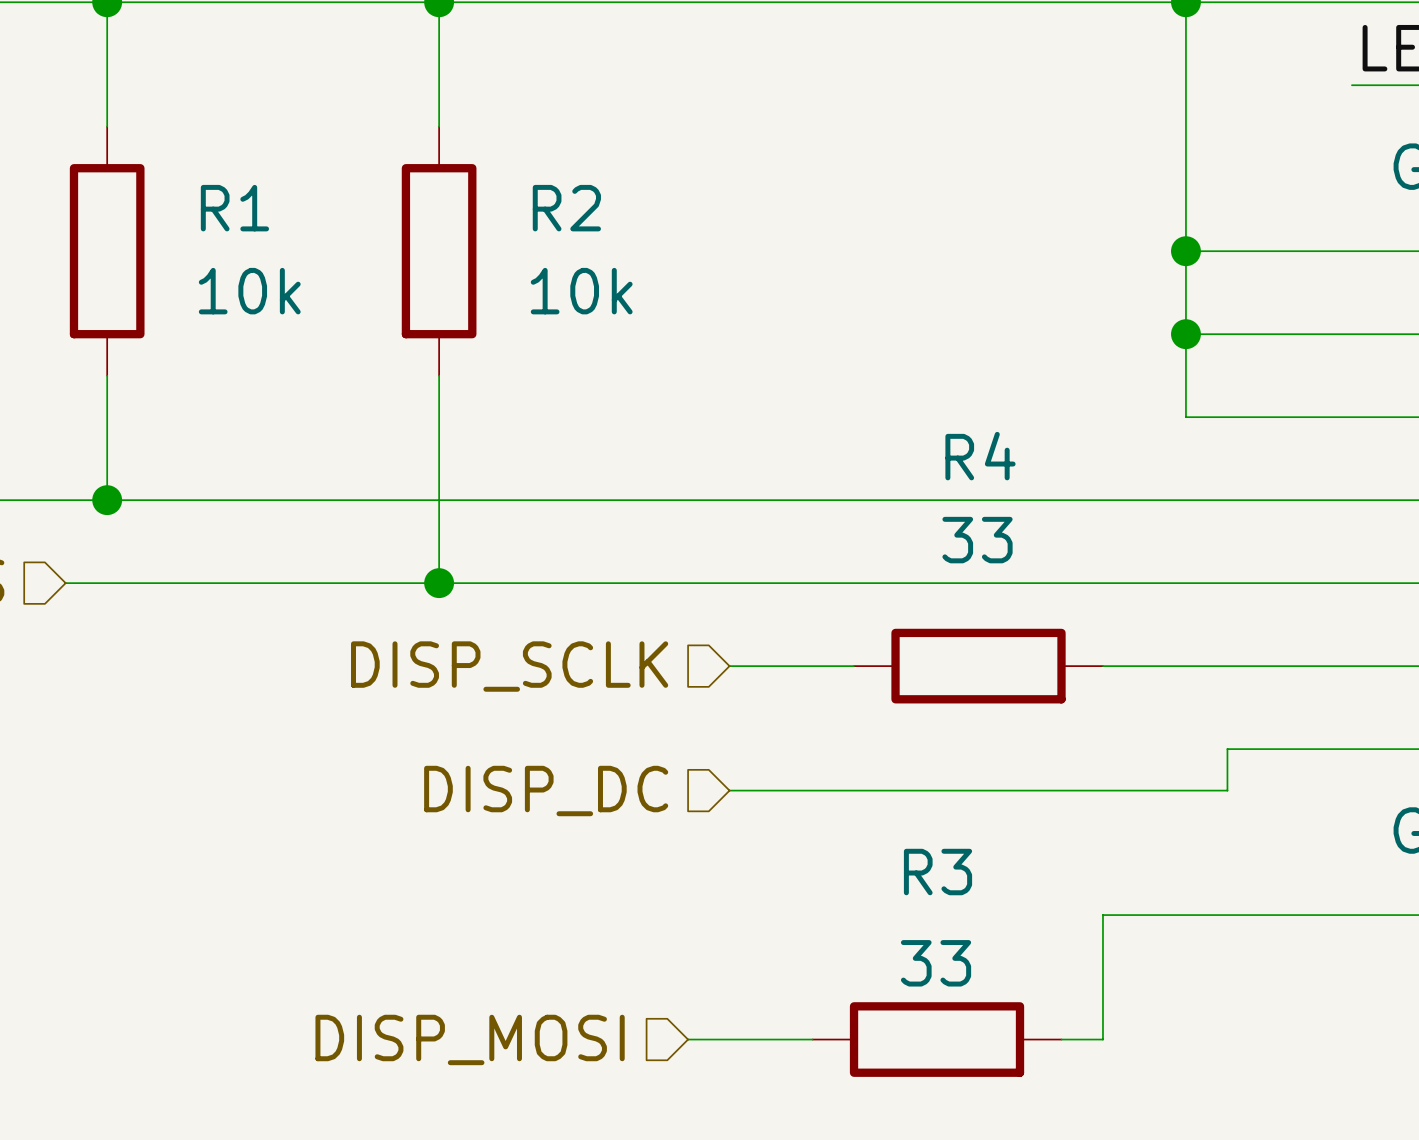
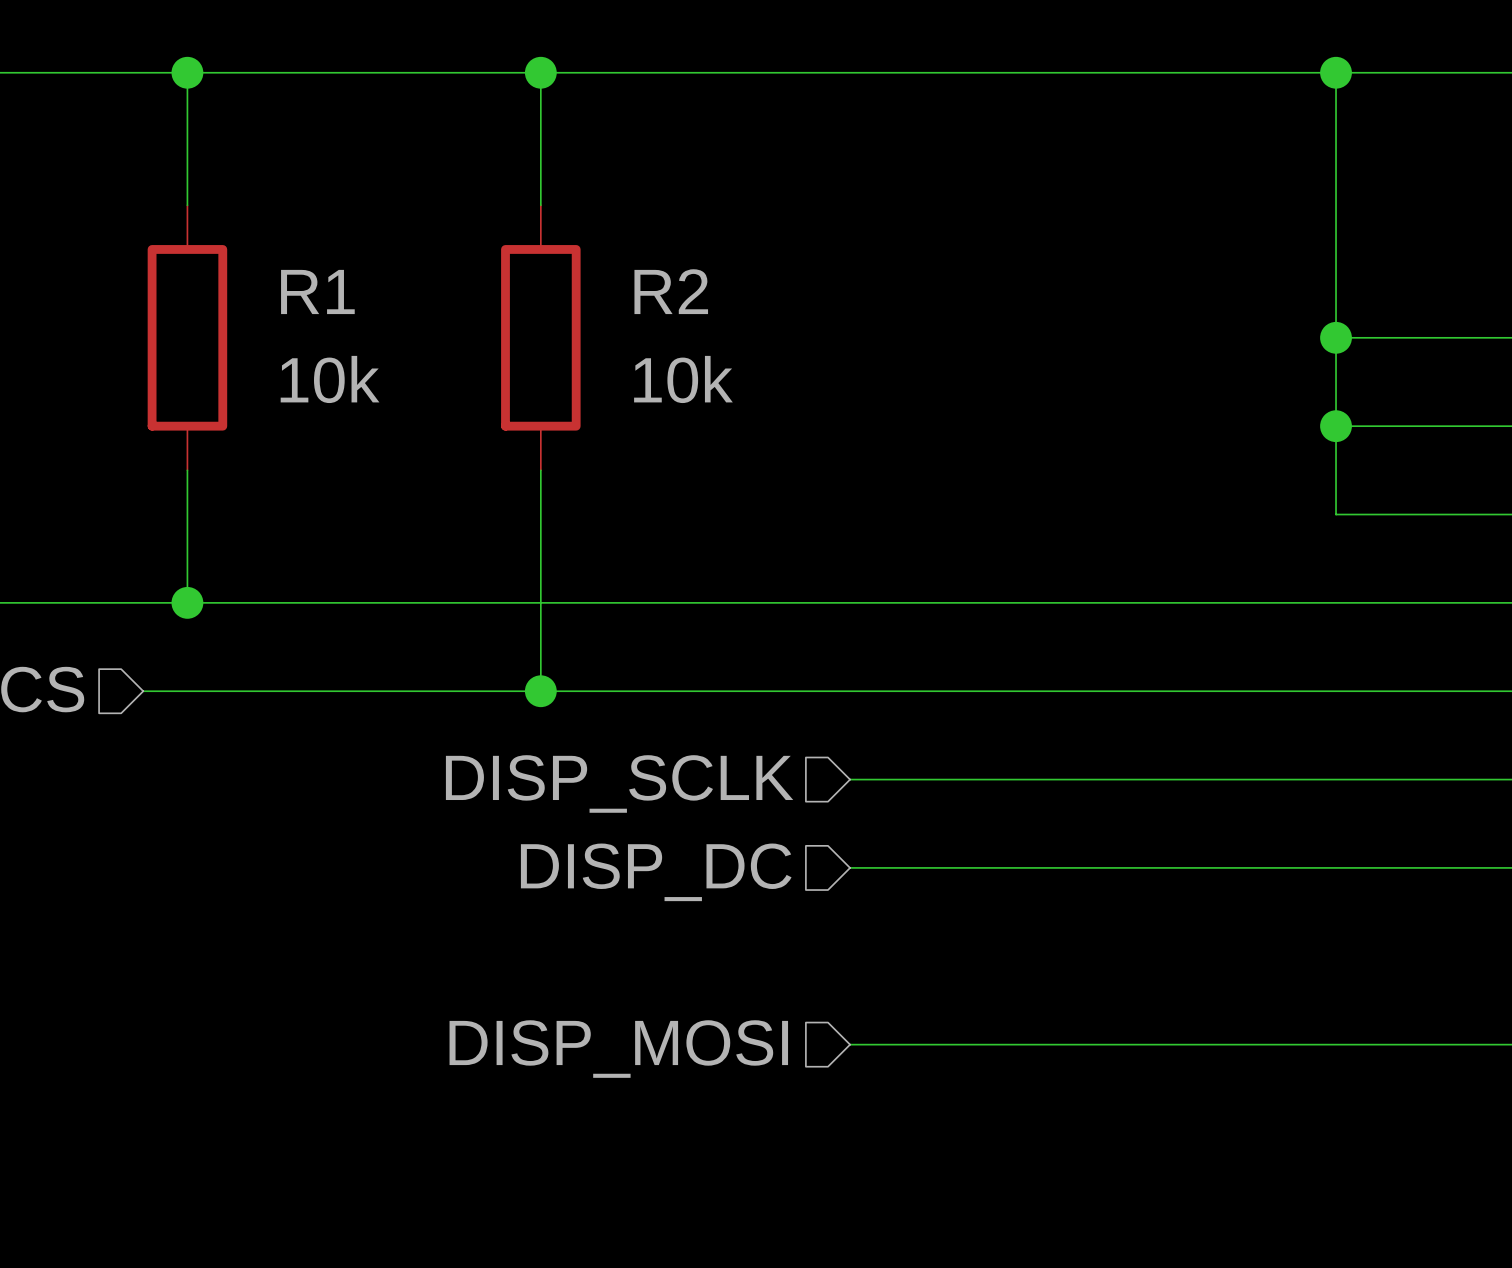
wire: none -> (982, 779) (1247, 779)
R4: 33 (978, 666) -> none
wire: (1227, 749) (1227, 790) (729, 790) -> (1380, 867) (850, 867)
hierarchical label position: DISP_DC (546, 791) -> DISP_DC (656, 872)
wire: (1102, 915) (1102, 1039) (1061, 1039) -> (1247, 1044) (850, 1044)
hierarchical label position: DISP_MOSI (470, 1039) -> DISP_MOSI (618, 1049)
wire: (688, 1039) (812, 1039) -> none
R3: 33 (937, 1039) -> none

